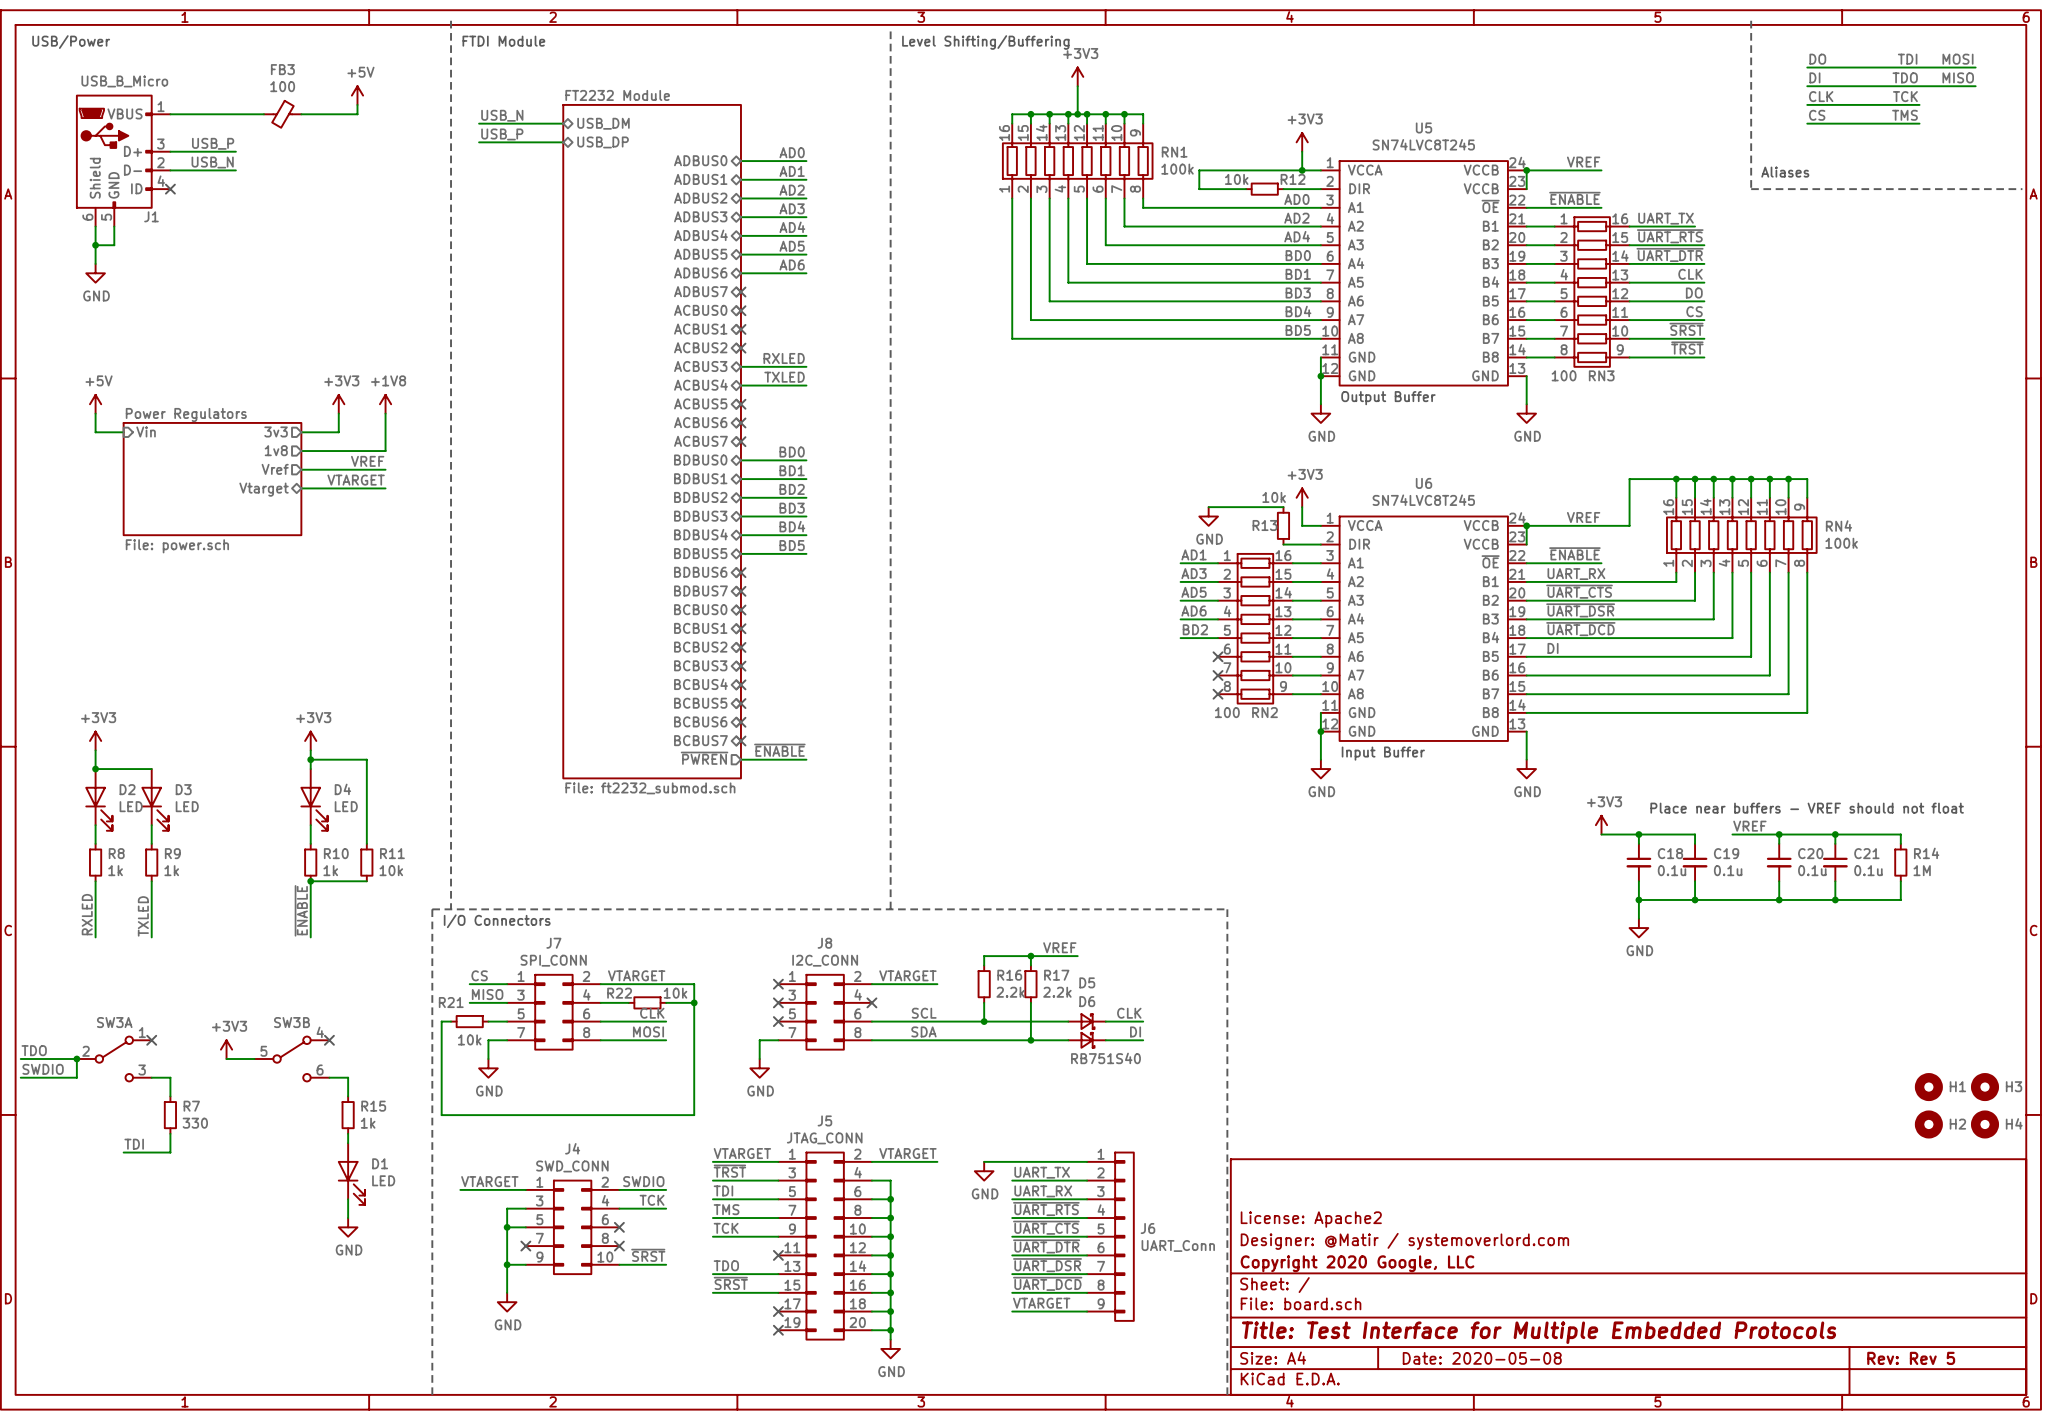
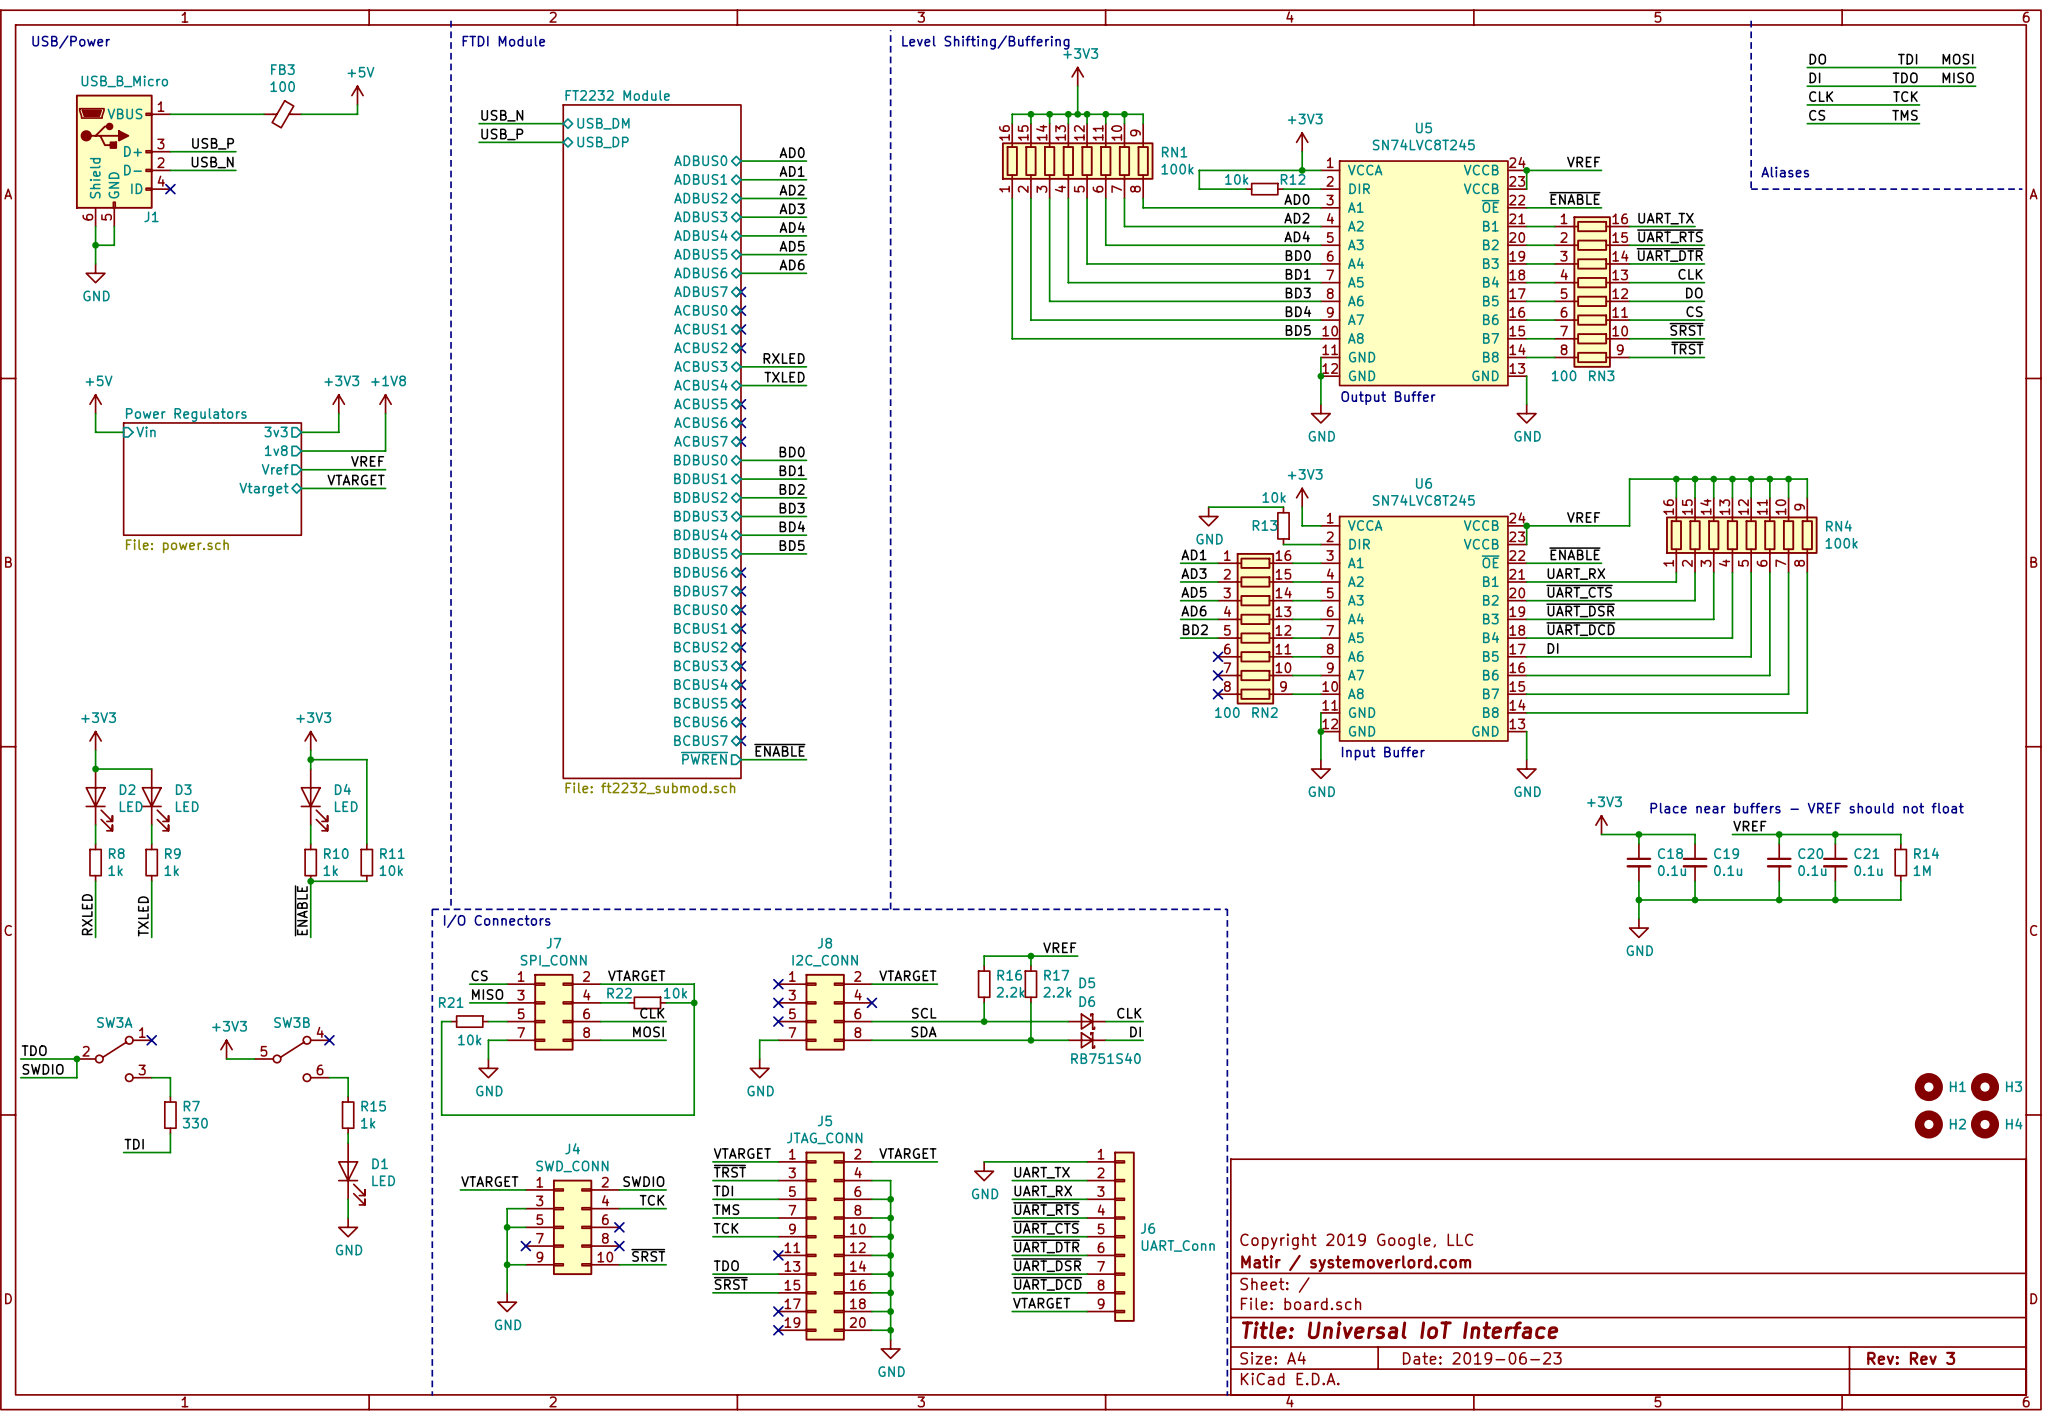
title block: License: Apache2 (1311, 1219) -> none
title block: Designer: @Matir / systemoverlord.com (1404, 1241) -> Copyright 2019 Google, LLC (1356, 1241)
title block: Copyright 2020 Google, LLC (1357, 1263) -> Matir / systemoverlord.com (1356, 1263)
title block: Title: Test Interface for Multiple Embedded Protocols (1539, 1332) -> Title: Universal IoT Interface (1400, 1330)
title block: Date: 2020-05-08 (1482, 1358) -> Date: 2019-06-23 (1482, 1358)
title block: Rev: Rev 5 (1911, 1358) -> Rev: Rev 3 (1911, 1358)

